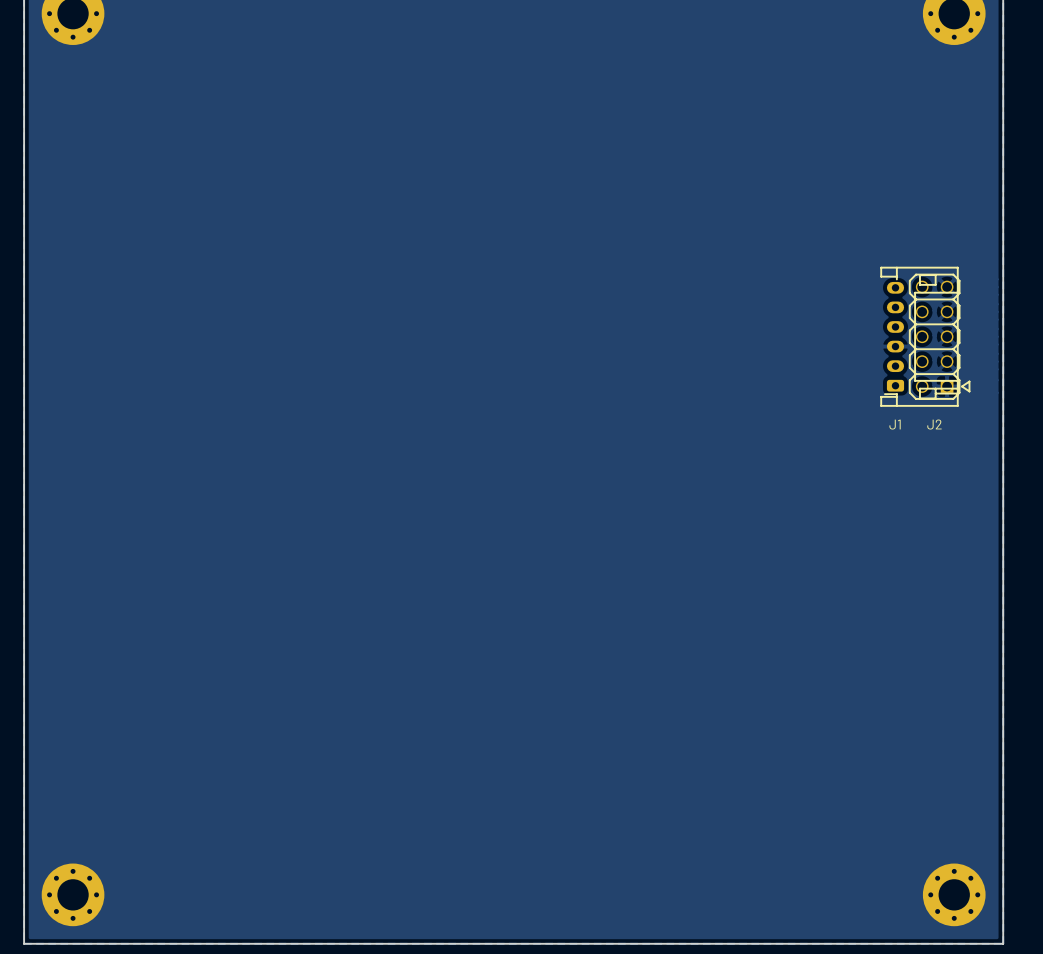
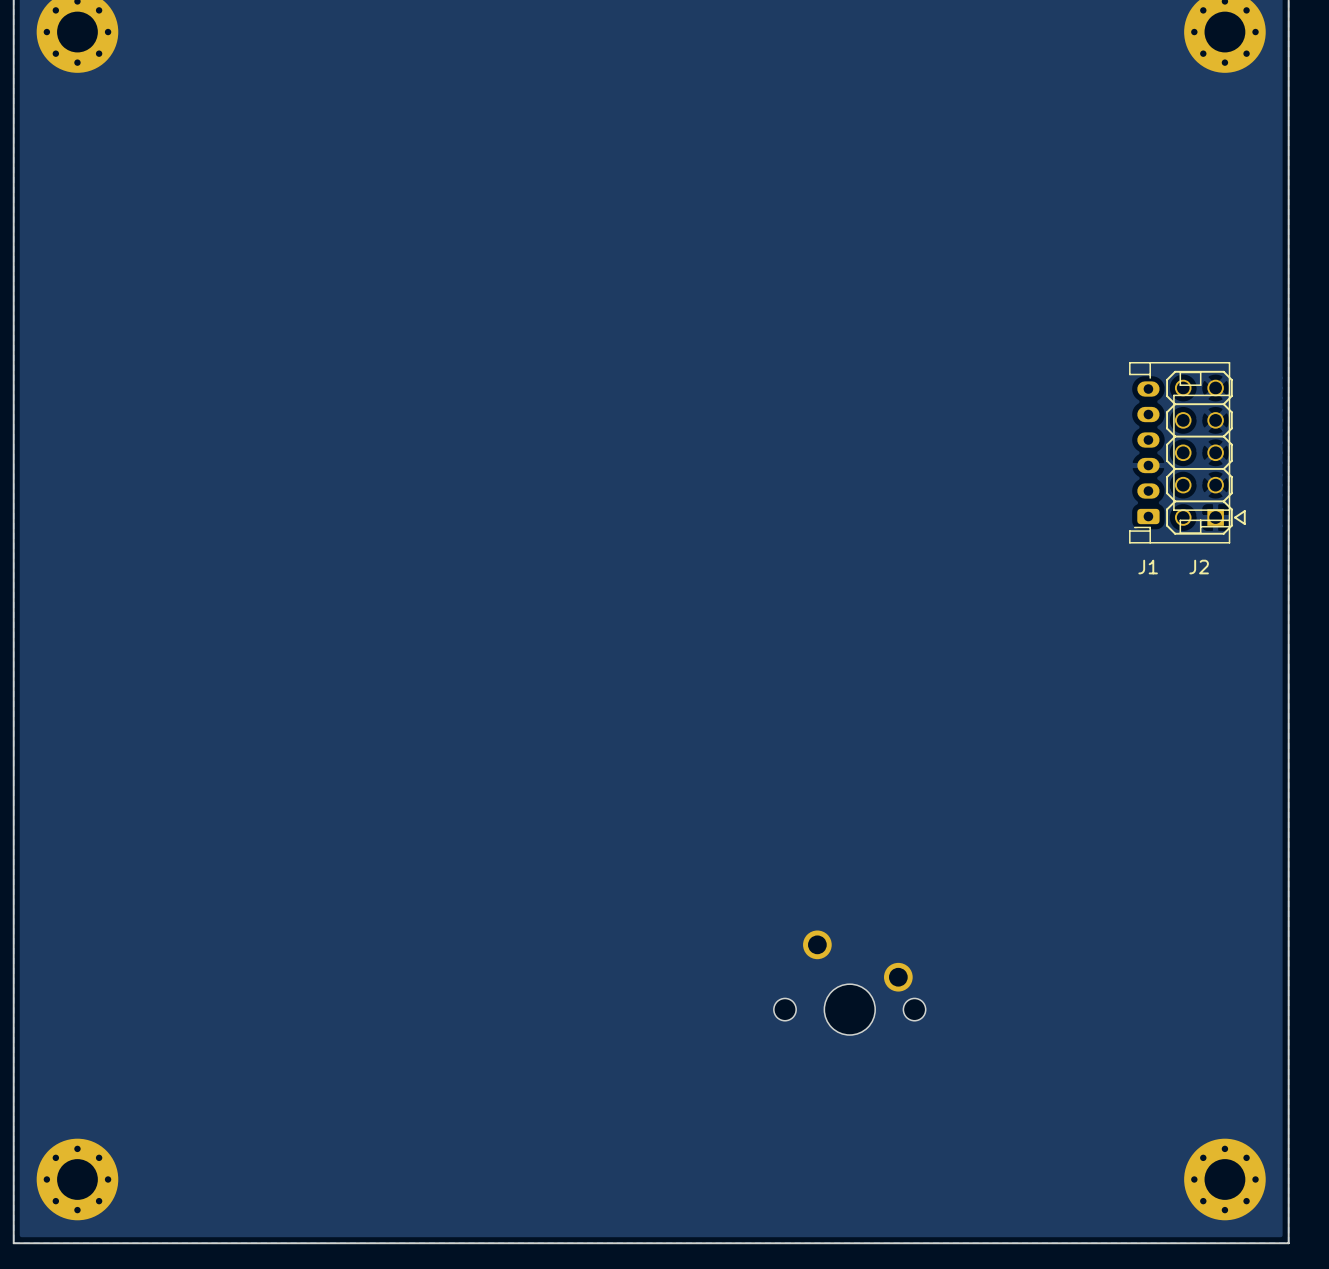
part: none -> (849, 982)

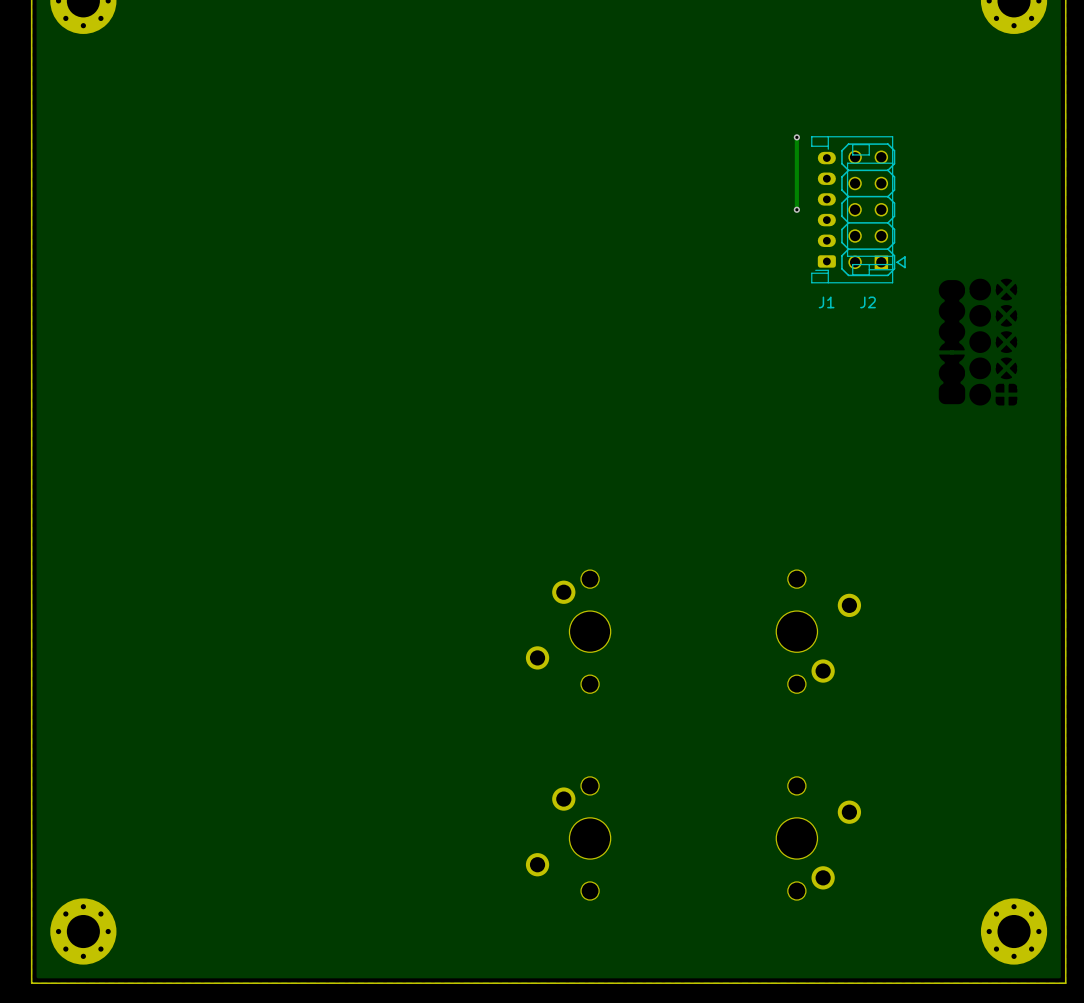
track: none -> (796, 137) (796, 209)
via: none -> (796, 137)
via: none -> (796, 209)
J1 position: (1179, 452) -> (852, 209)
J2 position: (1205, 452) -> (873, 209)
part: none -> (568, 631)
part: none -> (818, 631)
part: (849, 982) -> none
part: none -> (568, 838)
part: none -> (818, 838)

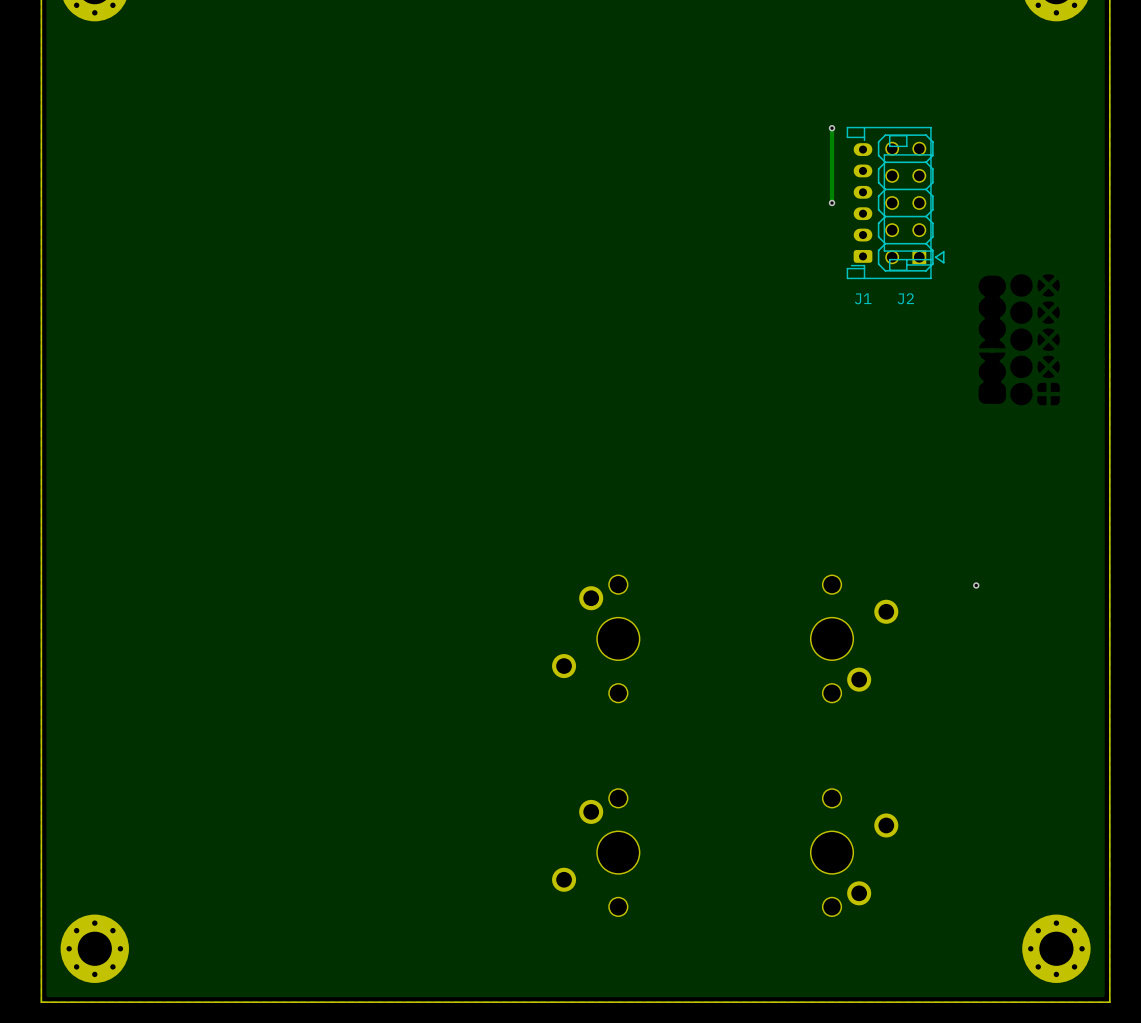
via: none -> (976, 585)

